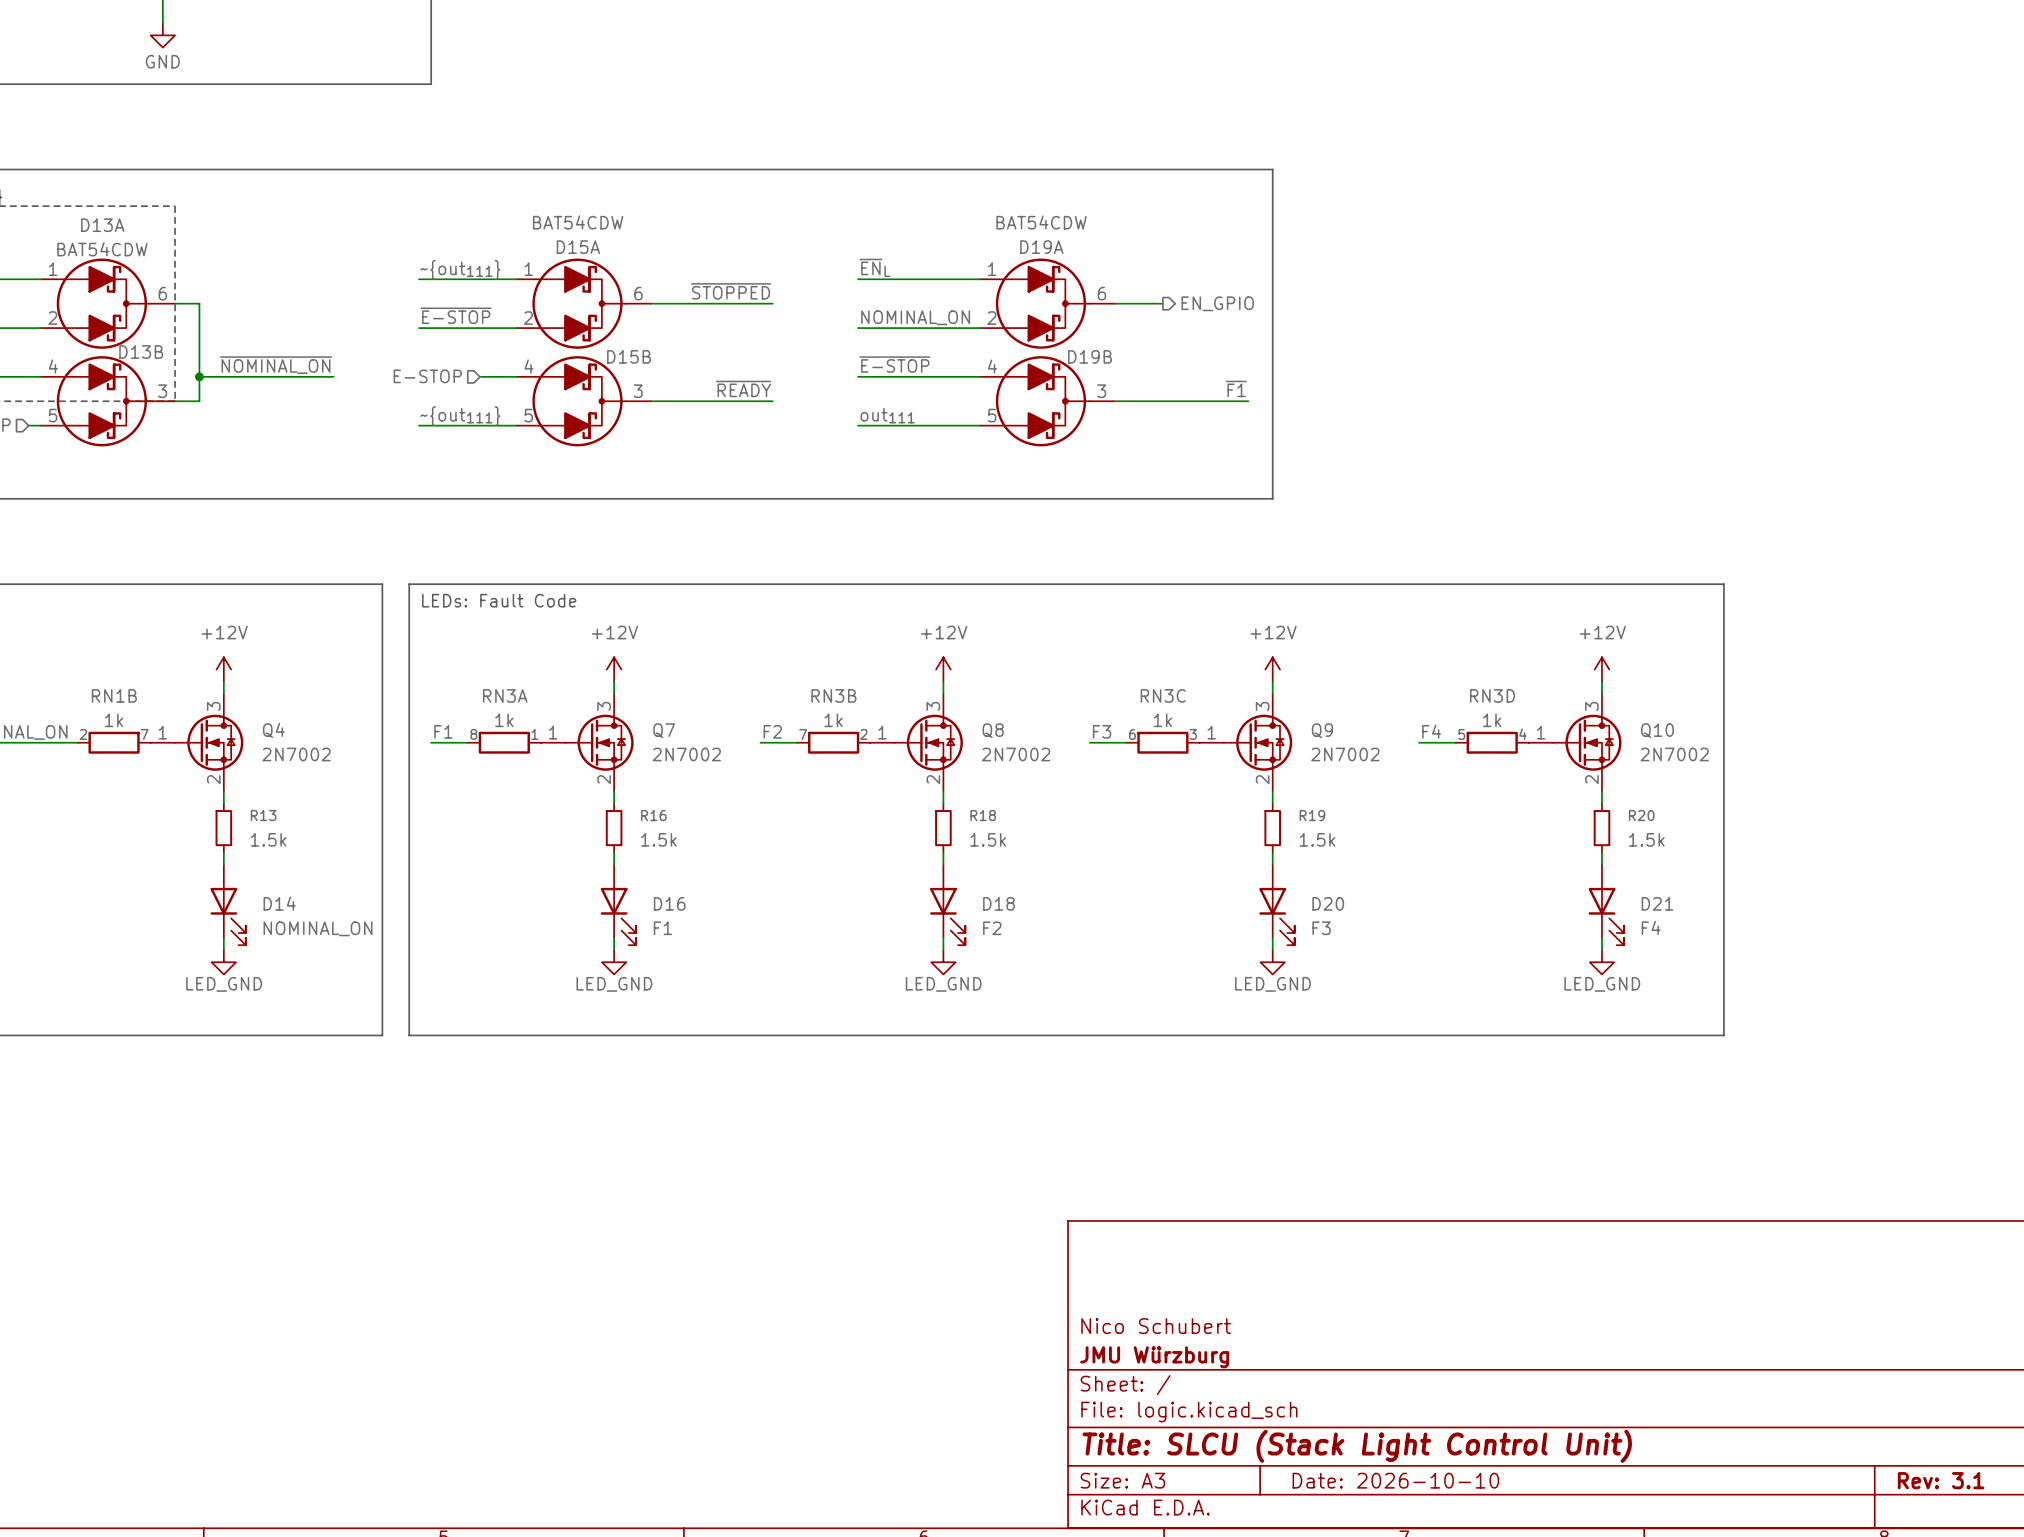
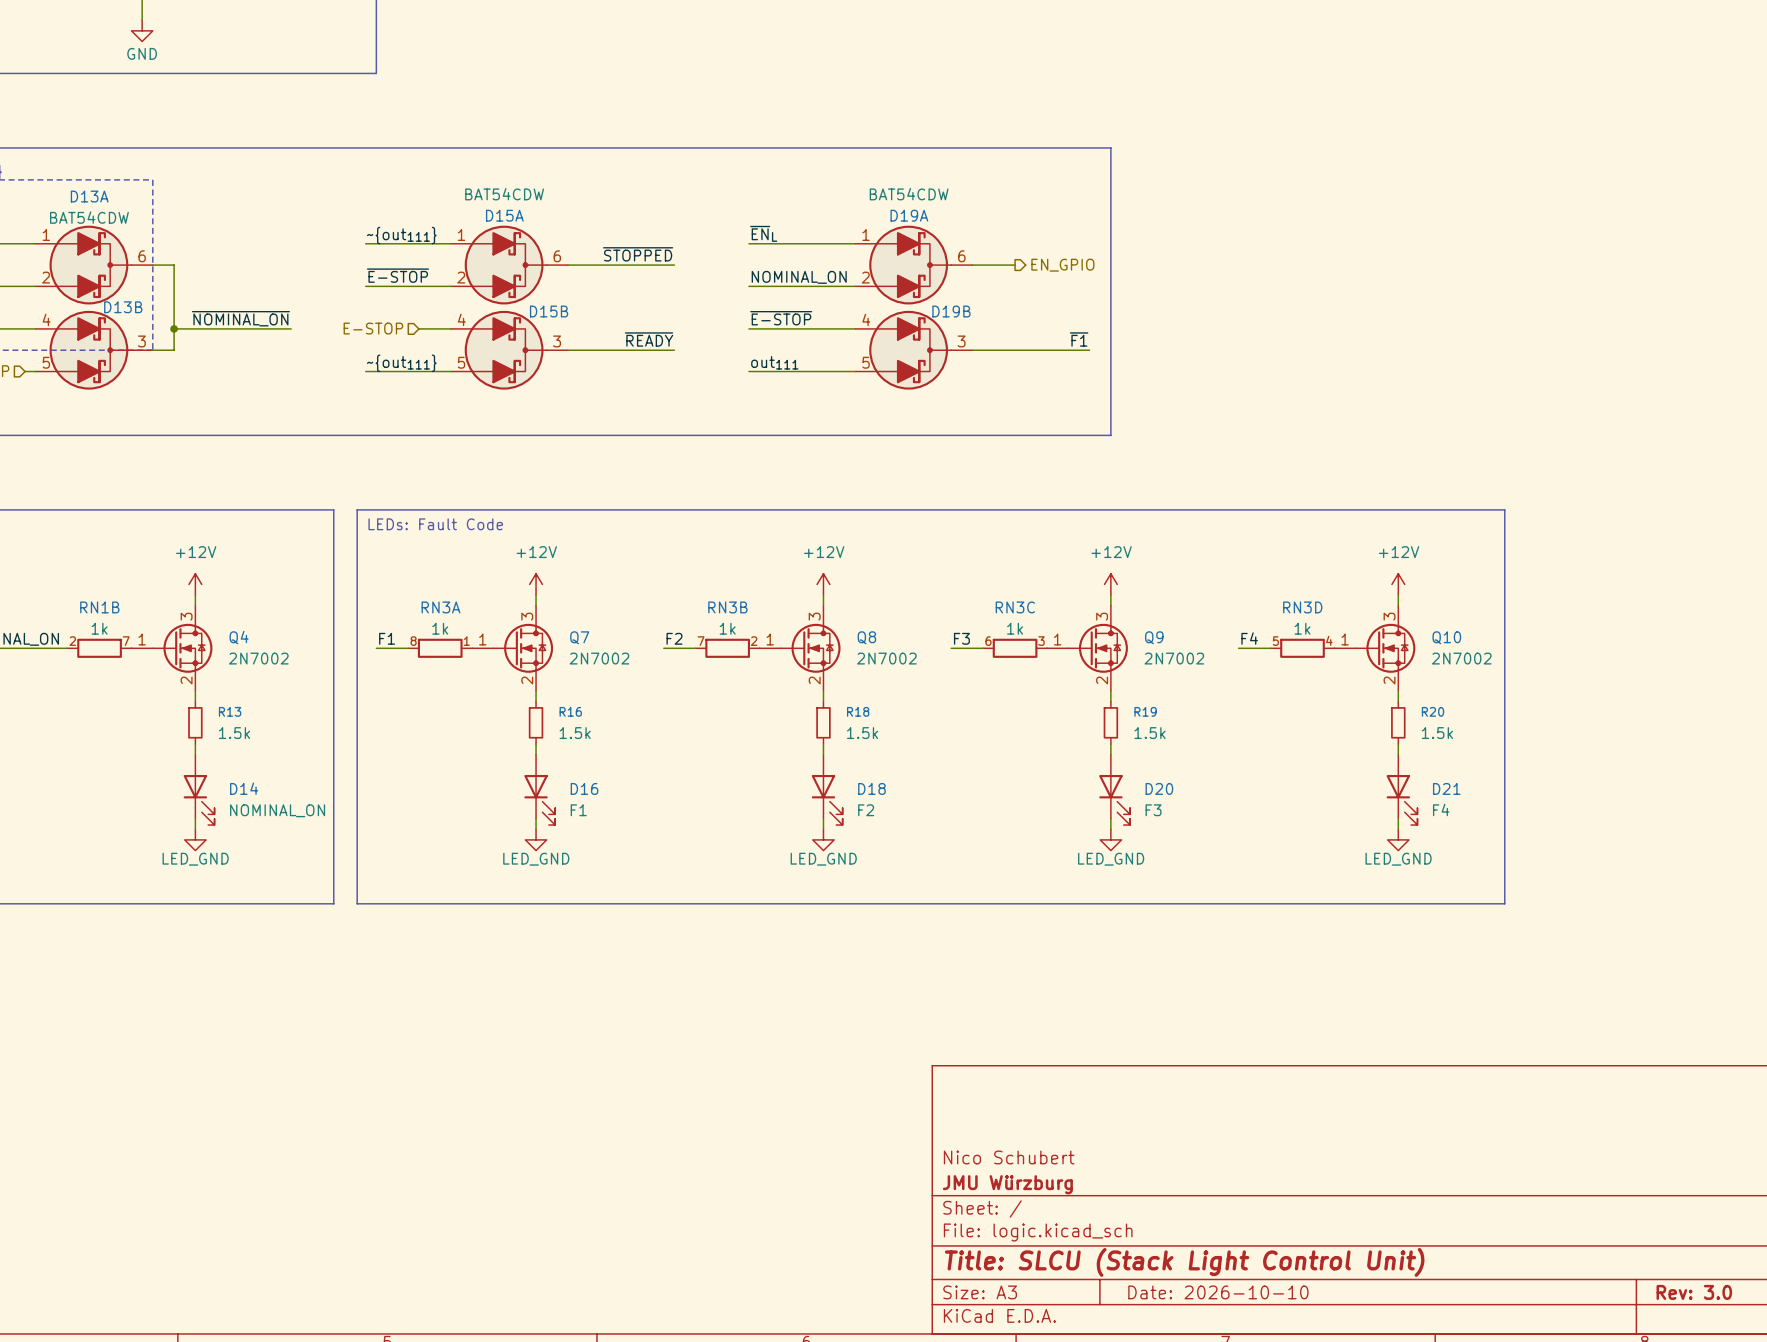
title block: Rev: 3.1 (1941, 1480) -> Rev: 3.0 (1694, 1292)

